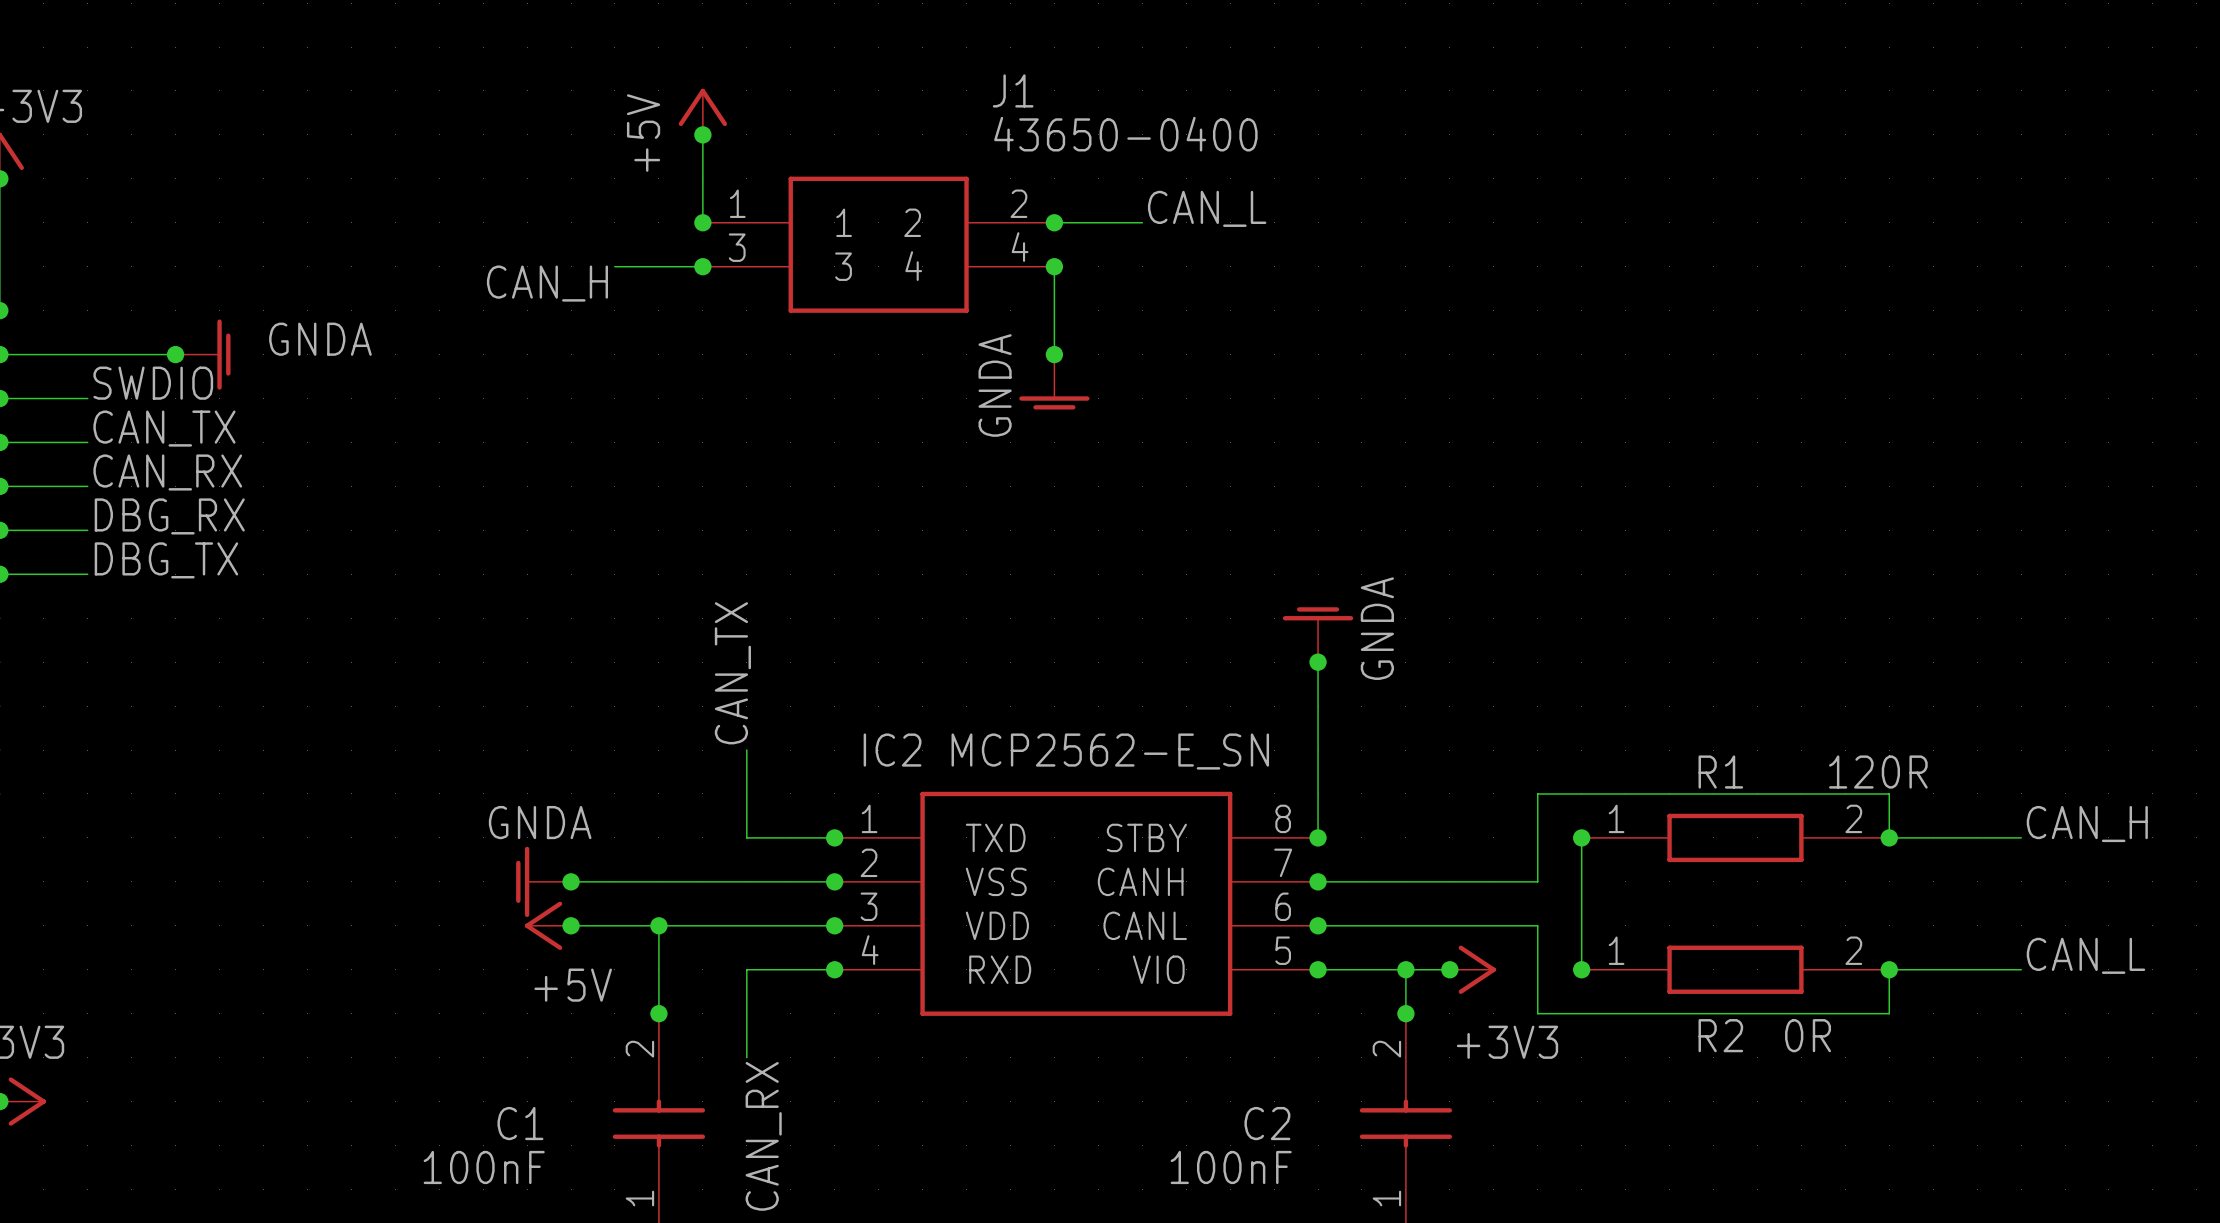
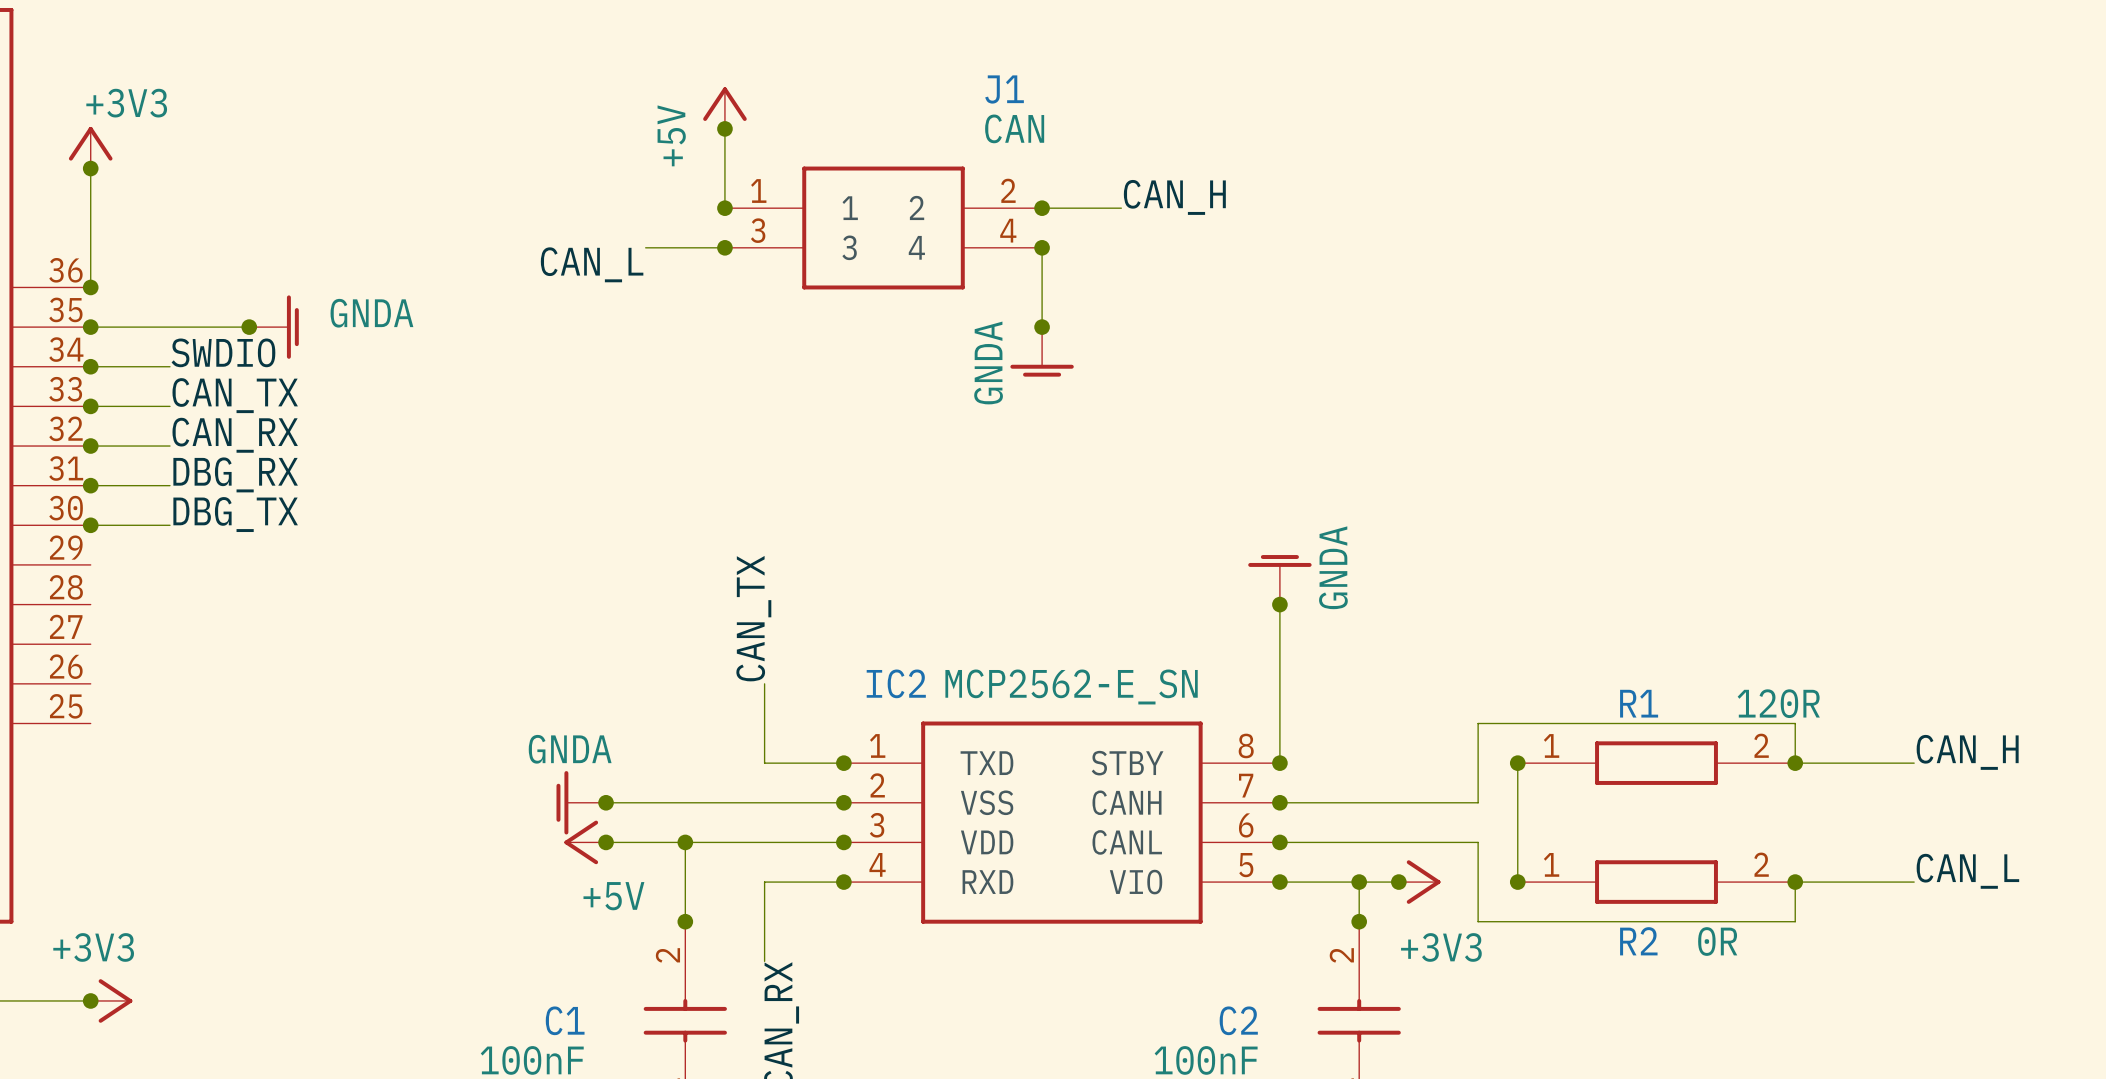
J1 value: 43650-0400 (1125, 134) -> CAN (1014, 128)
label: CAN_L (1207, 208) -> CAN_H (1174, 197)
label: CAN_H (547, 283) -> CAN_L (592, 264)

